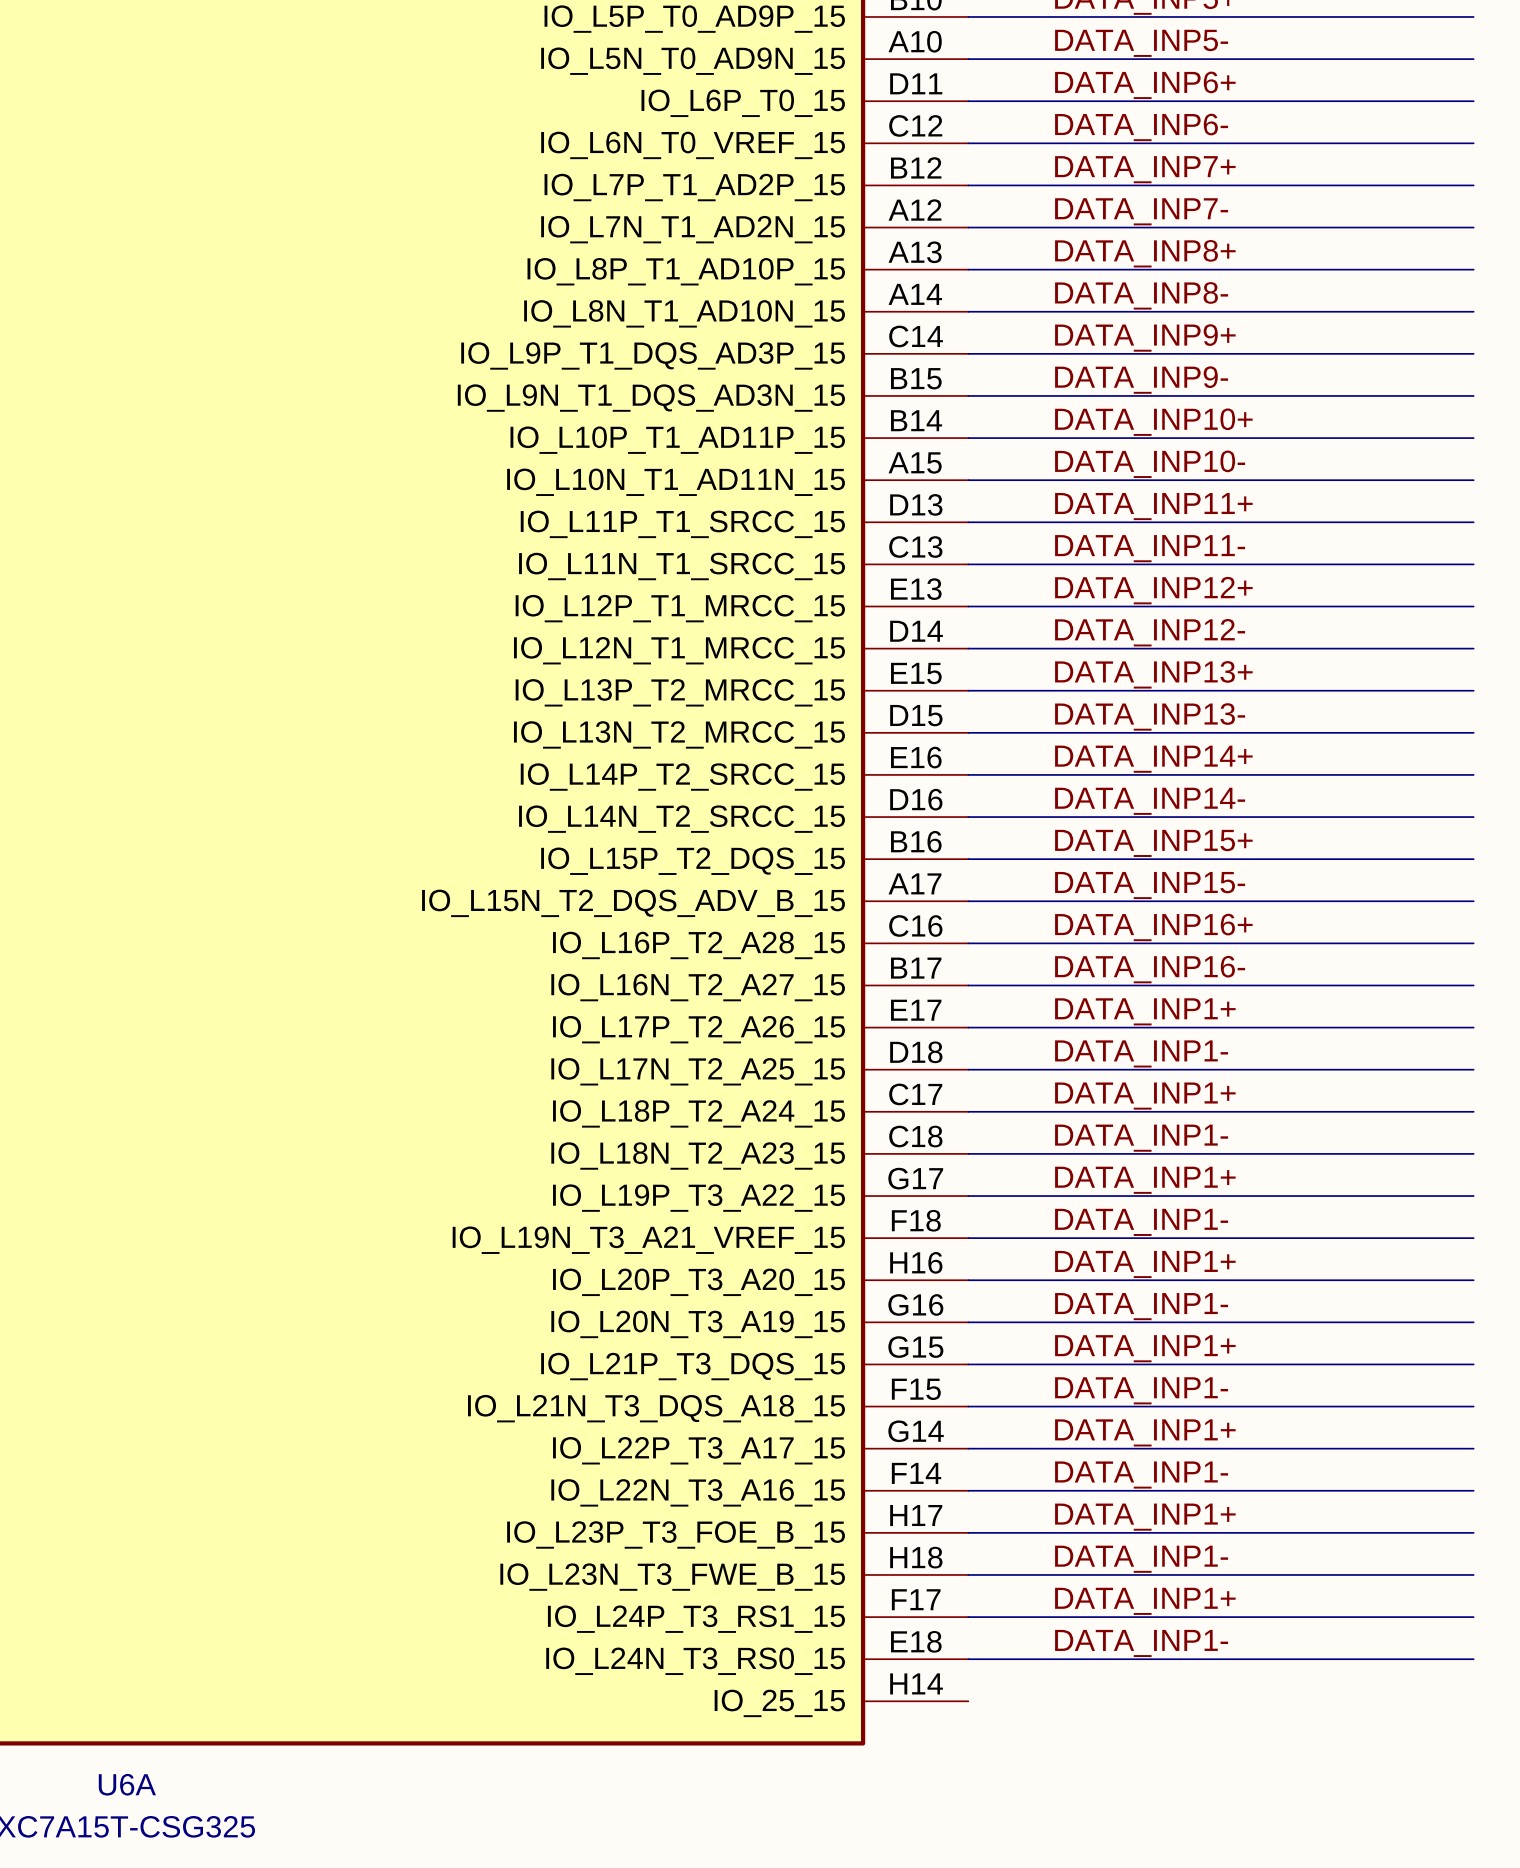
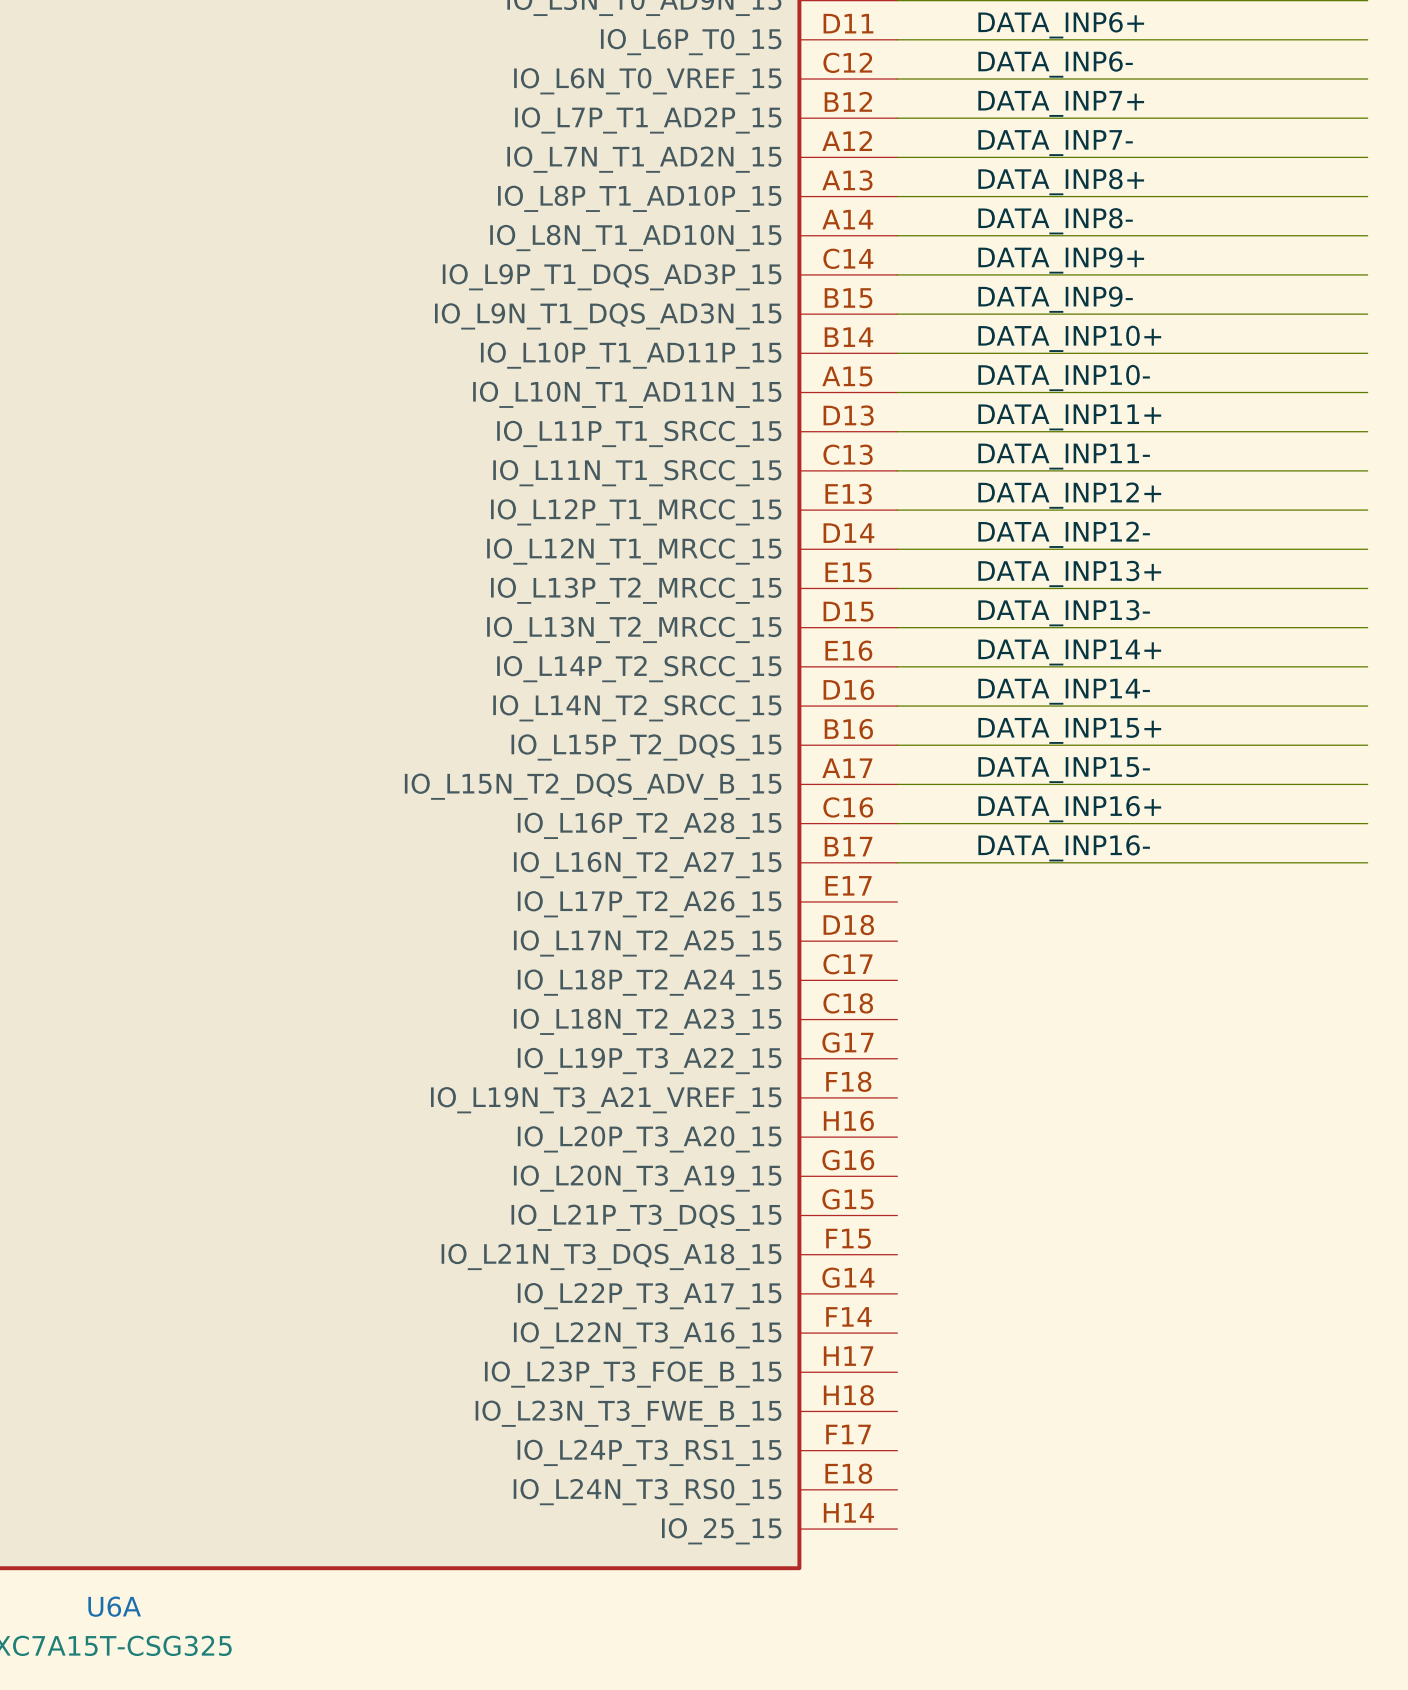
label: DATA_INP1+ (1145, 1011) -> none
wire: (968, 1027) (1473, 1027) -> none
label: DATA_INP1- (1141, 1053) -> none
wire: (968, 1069) (1473, 1069) -> none
label: DATA_INP1+ (1145, 1096) -> none
wire: (968, 1111) (1473, 1111) -> none
label: DATA_INP1- (1141, 1138) -> none
wire: (968, 1153) (1473, 1153) -> none
label: DATA_INP1+ (1145, 1180) -> none
wire: (968, 1196) (1473, 1196) -> none
label: DATA_INP1- (1141, 1222) -> none
wire: (968, 1238) (1473, 1238) -> none
label: DATA_INP1+ (1145, 1264) -> none
wire: (968, 1280) (1473, 1280) -> none
label: DATA_INP1- (1141, 1306) -> none
wire: (968, 1322) (1473, 1322) -> none
label: DATA_INP1+ (1145, 1348) -> none
wire: (968, 1364) (1473, 1364) -> none
label: DATA_INP1- (1141, 1390) -> none
wire: (968, 1406) (1473, 1406) -> none
label: DATA_INP1+ (1145, 1432) -> none
wire: (968, 1448) (1473, 1448) -> none
label: DATA_INP1- (1141, 1475) -> none
wire: (968, 1490) (1473, 1490) -> none
label: DATA_INP1+ (1145, 1517) -> none
wire: (968, 1532) (1473, 1532) -> none
label: DATA_INP1- (1141, 1559) -> none
wire: (968, 1574) (1473, 1574) -> none
label: DATA_INP1+ (1145, 1601) -> none
wire: (968, 1617) (1473, 1617) -> none
label: DATA_INP1- (1141, 1643) -> none
wire: (968, 1659) (1473, 1659) -> none

